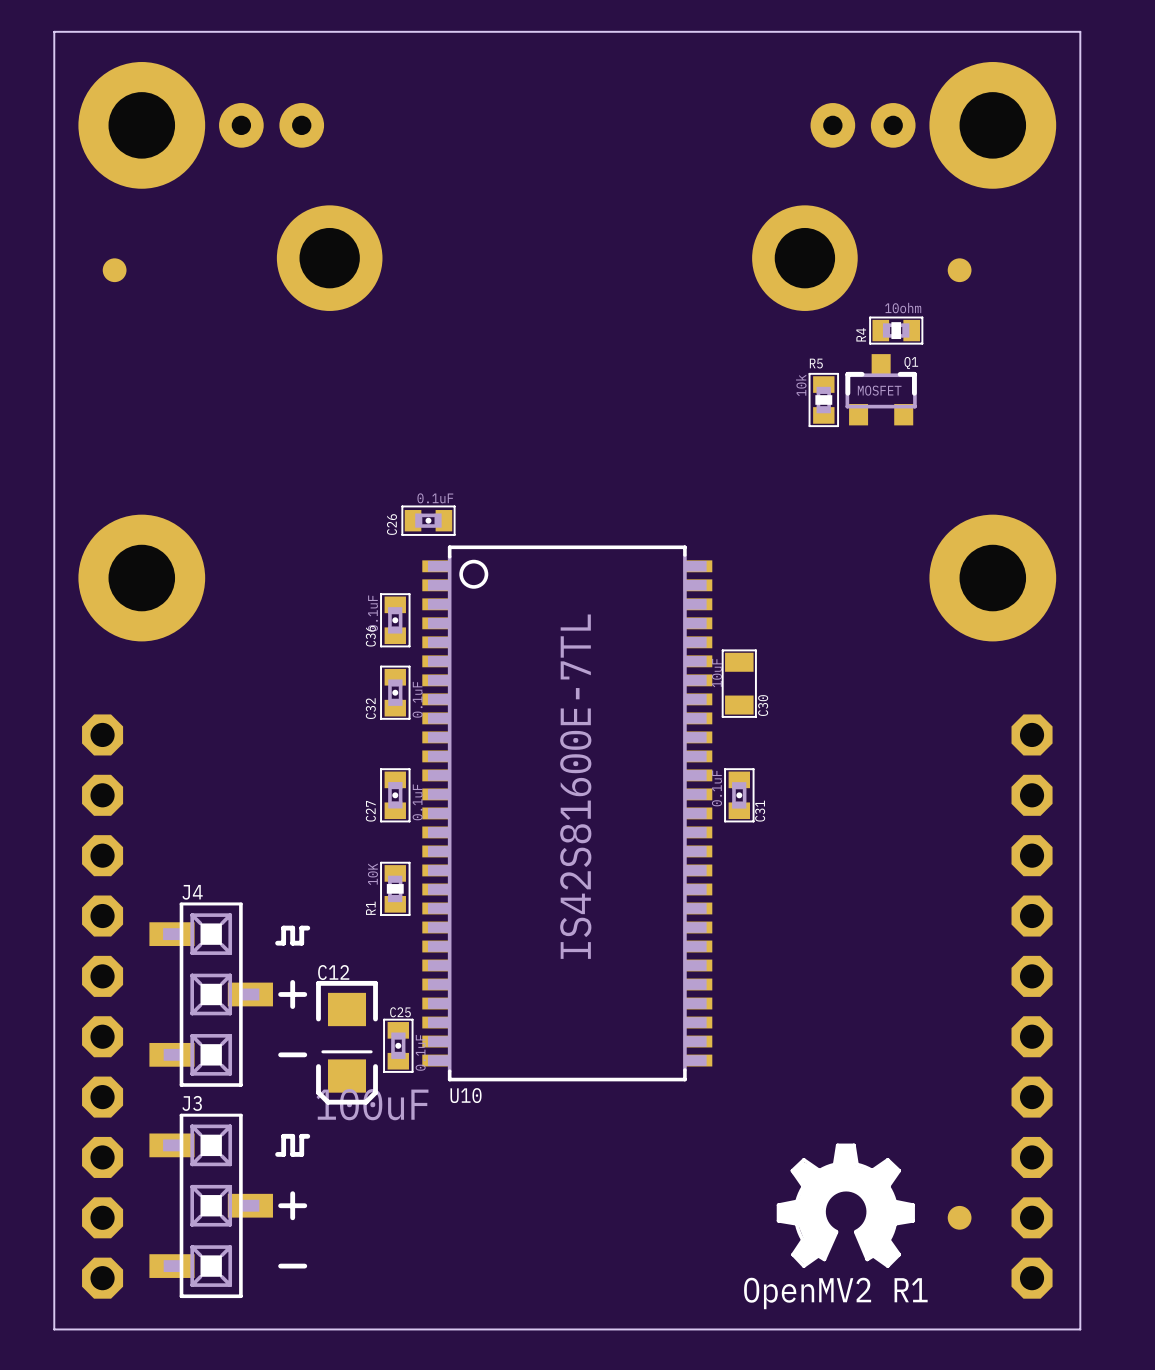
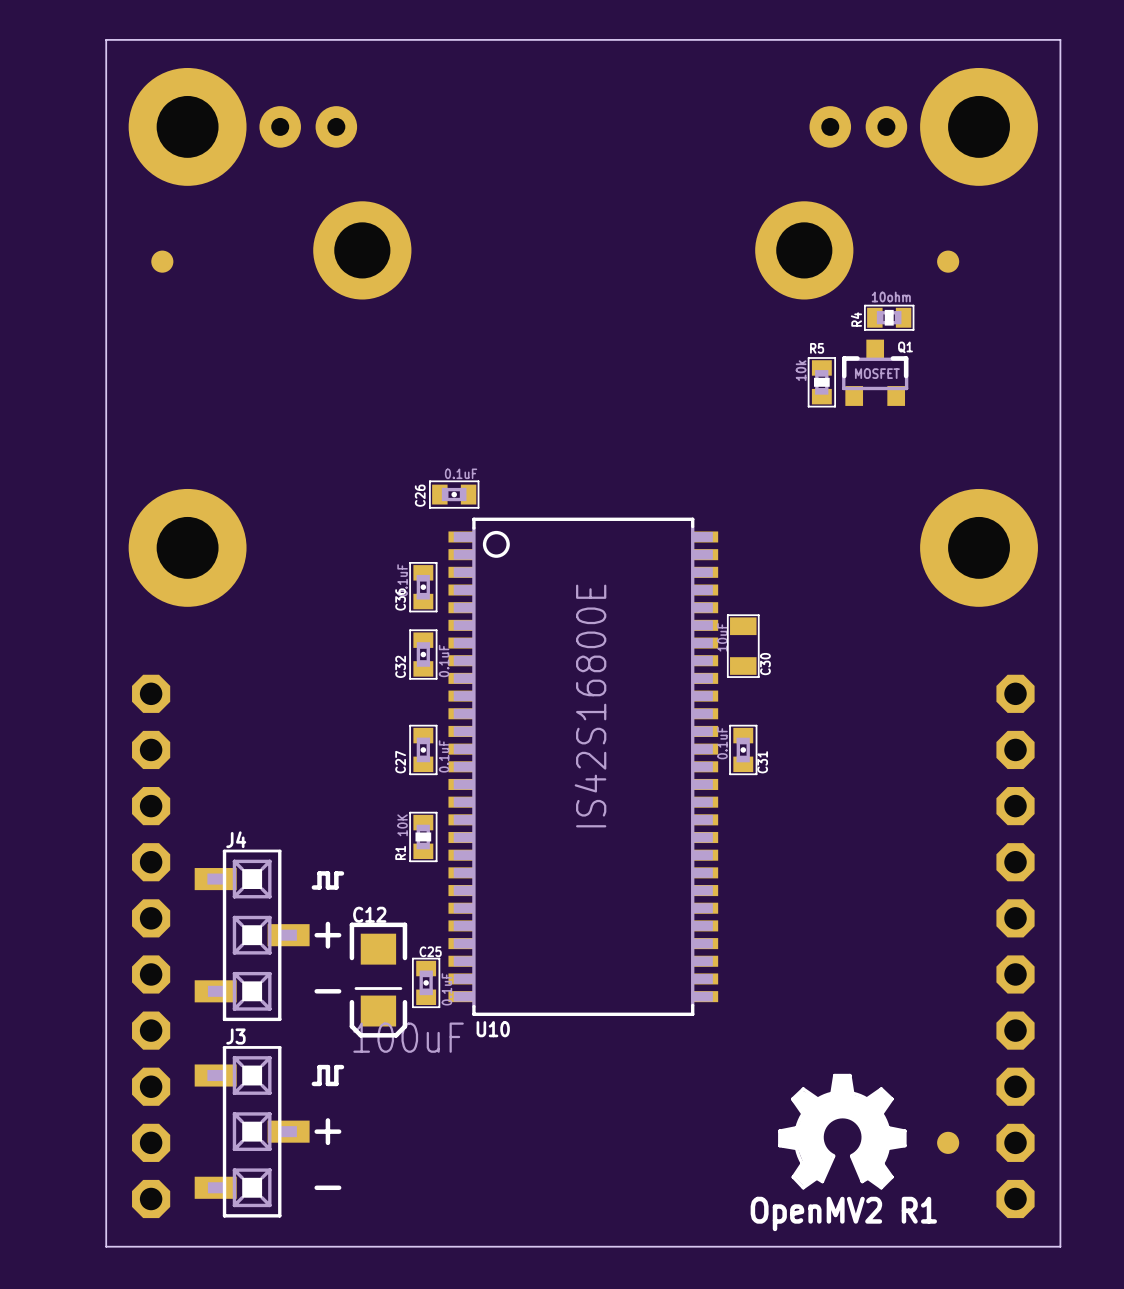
U10 value: IS42S81600E-7TL (575, 786) -> IS42S16800E (590, 706)

